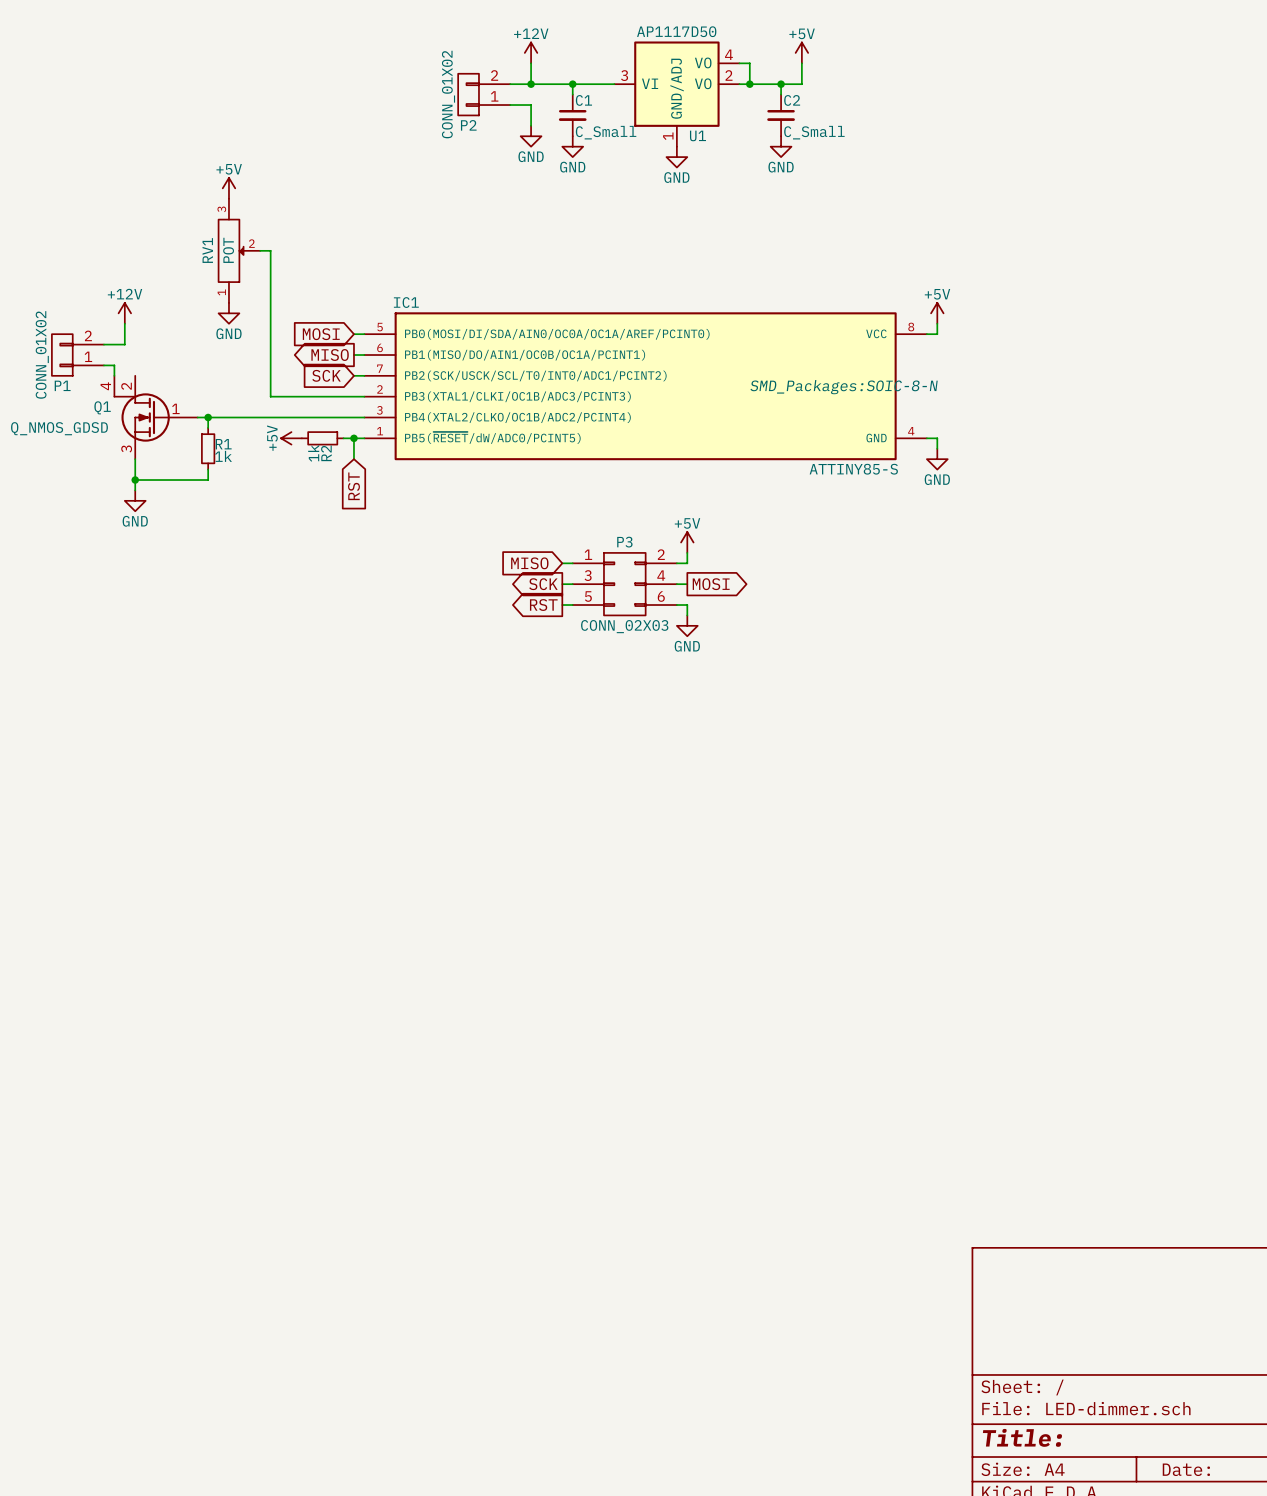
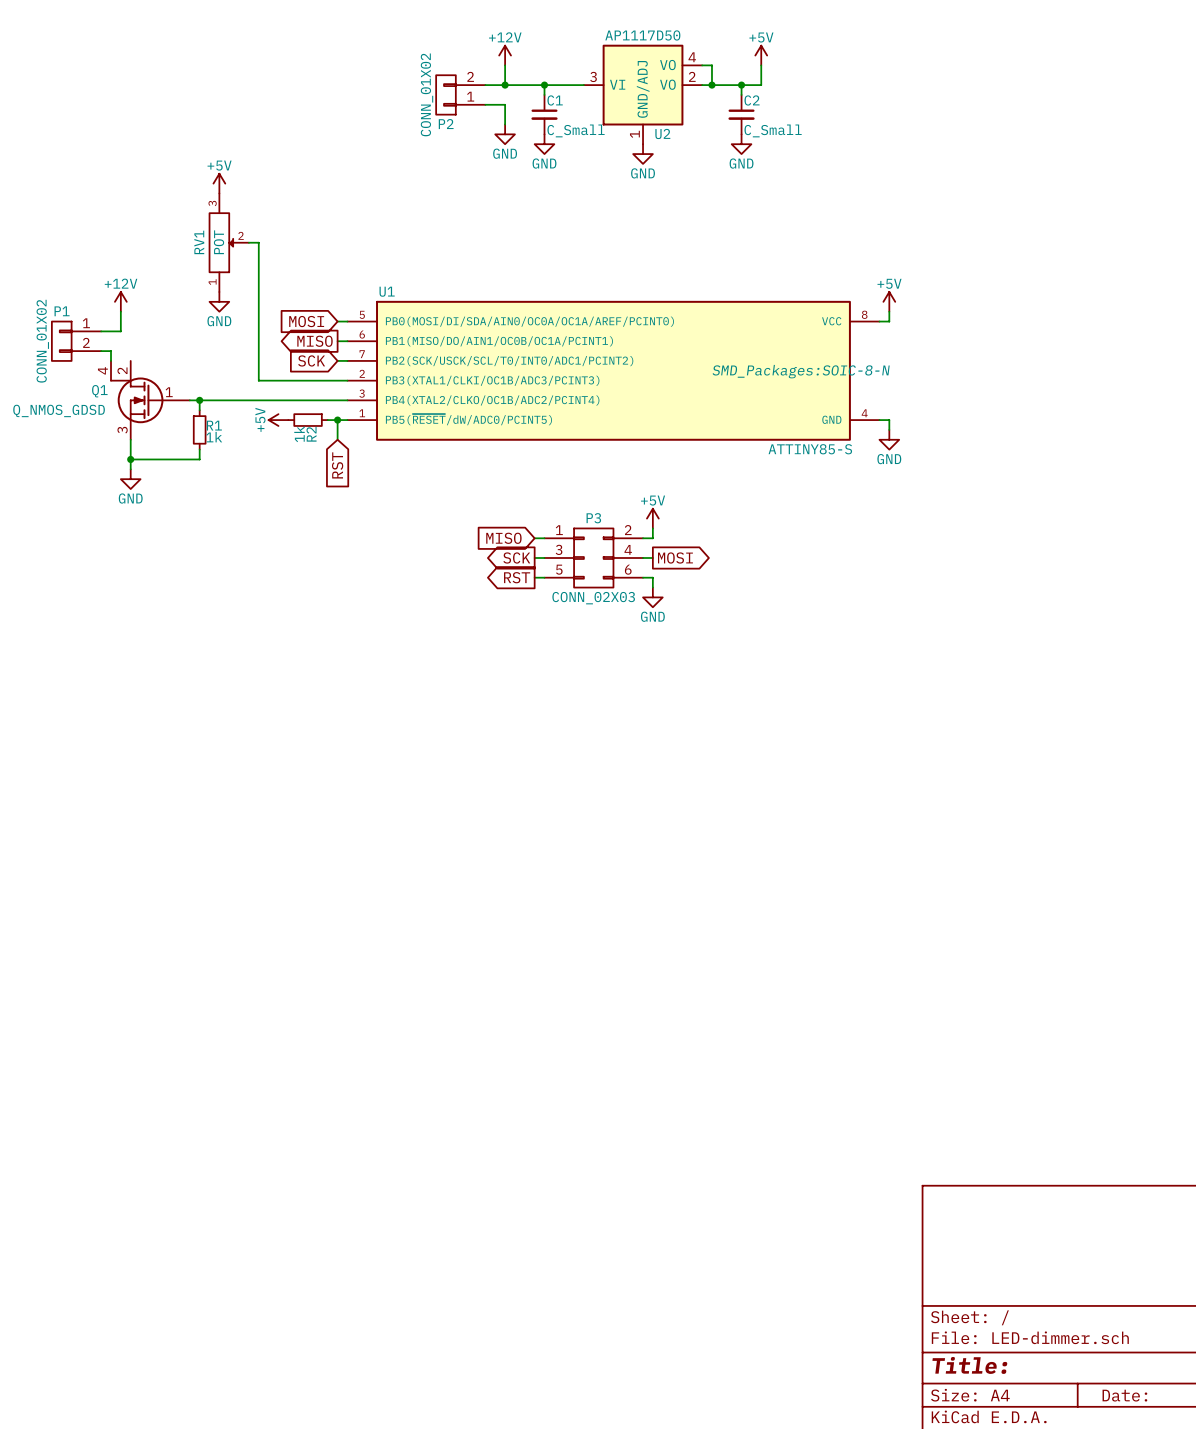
U1 name: U1 (697, 135) -> U2 (662, 133)
IC1 name: IC1 (406, 302) -> U1 (387, 291)
P1 flip: as is (62, 355) -> up-down (61, 341)

